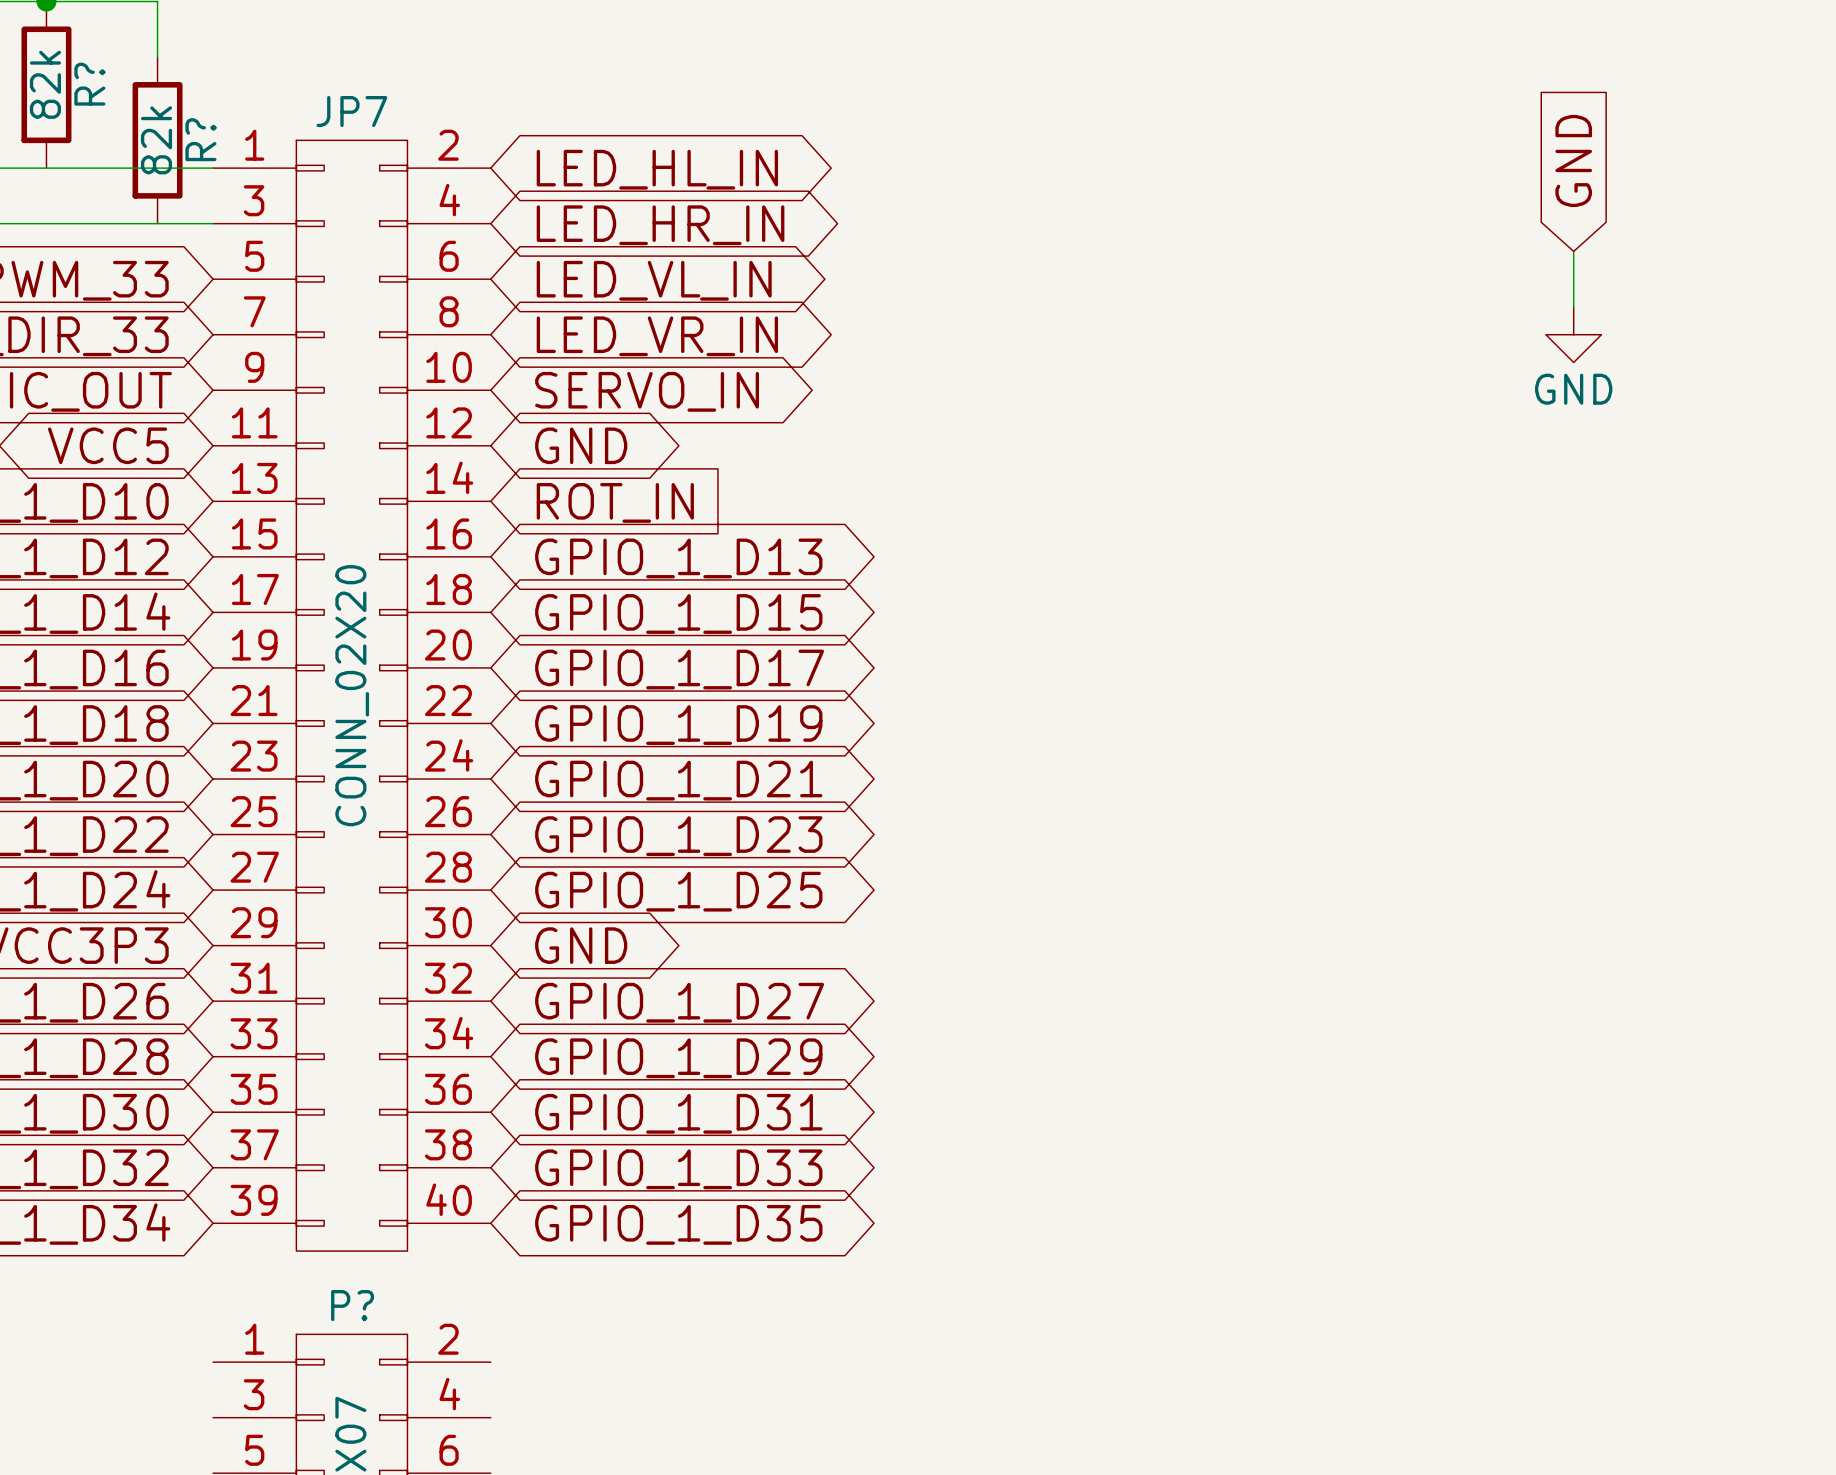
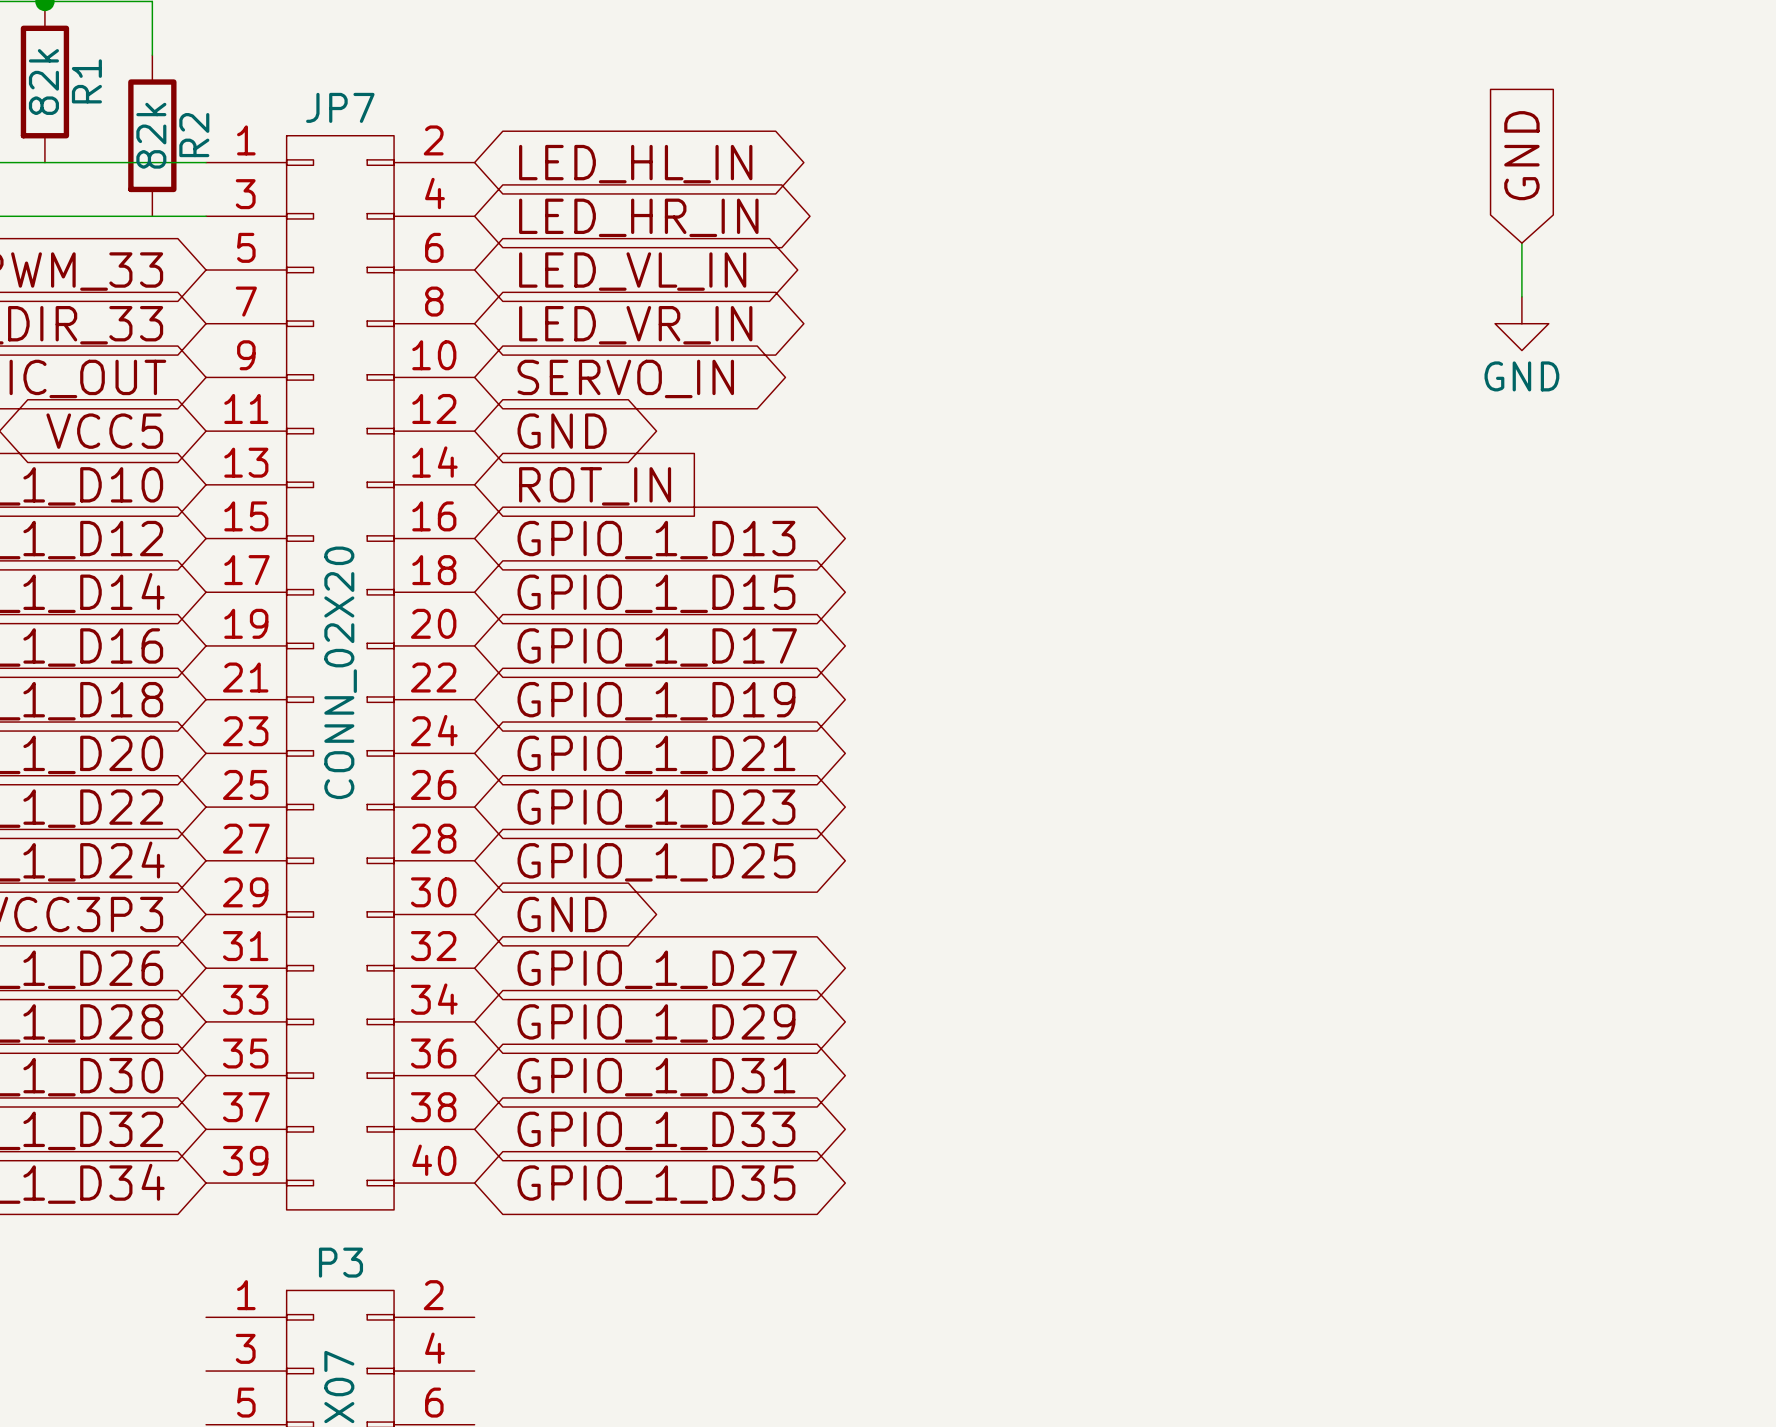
R? name: R? (89, 84) -> R1 (86, 81)
R? name: R? (200, 139) -> R2 (194, 135)
P? name: P? (352, 1305) -> P3 (340, 1262)

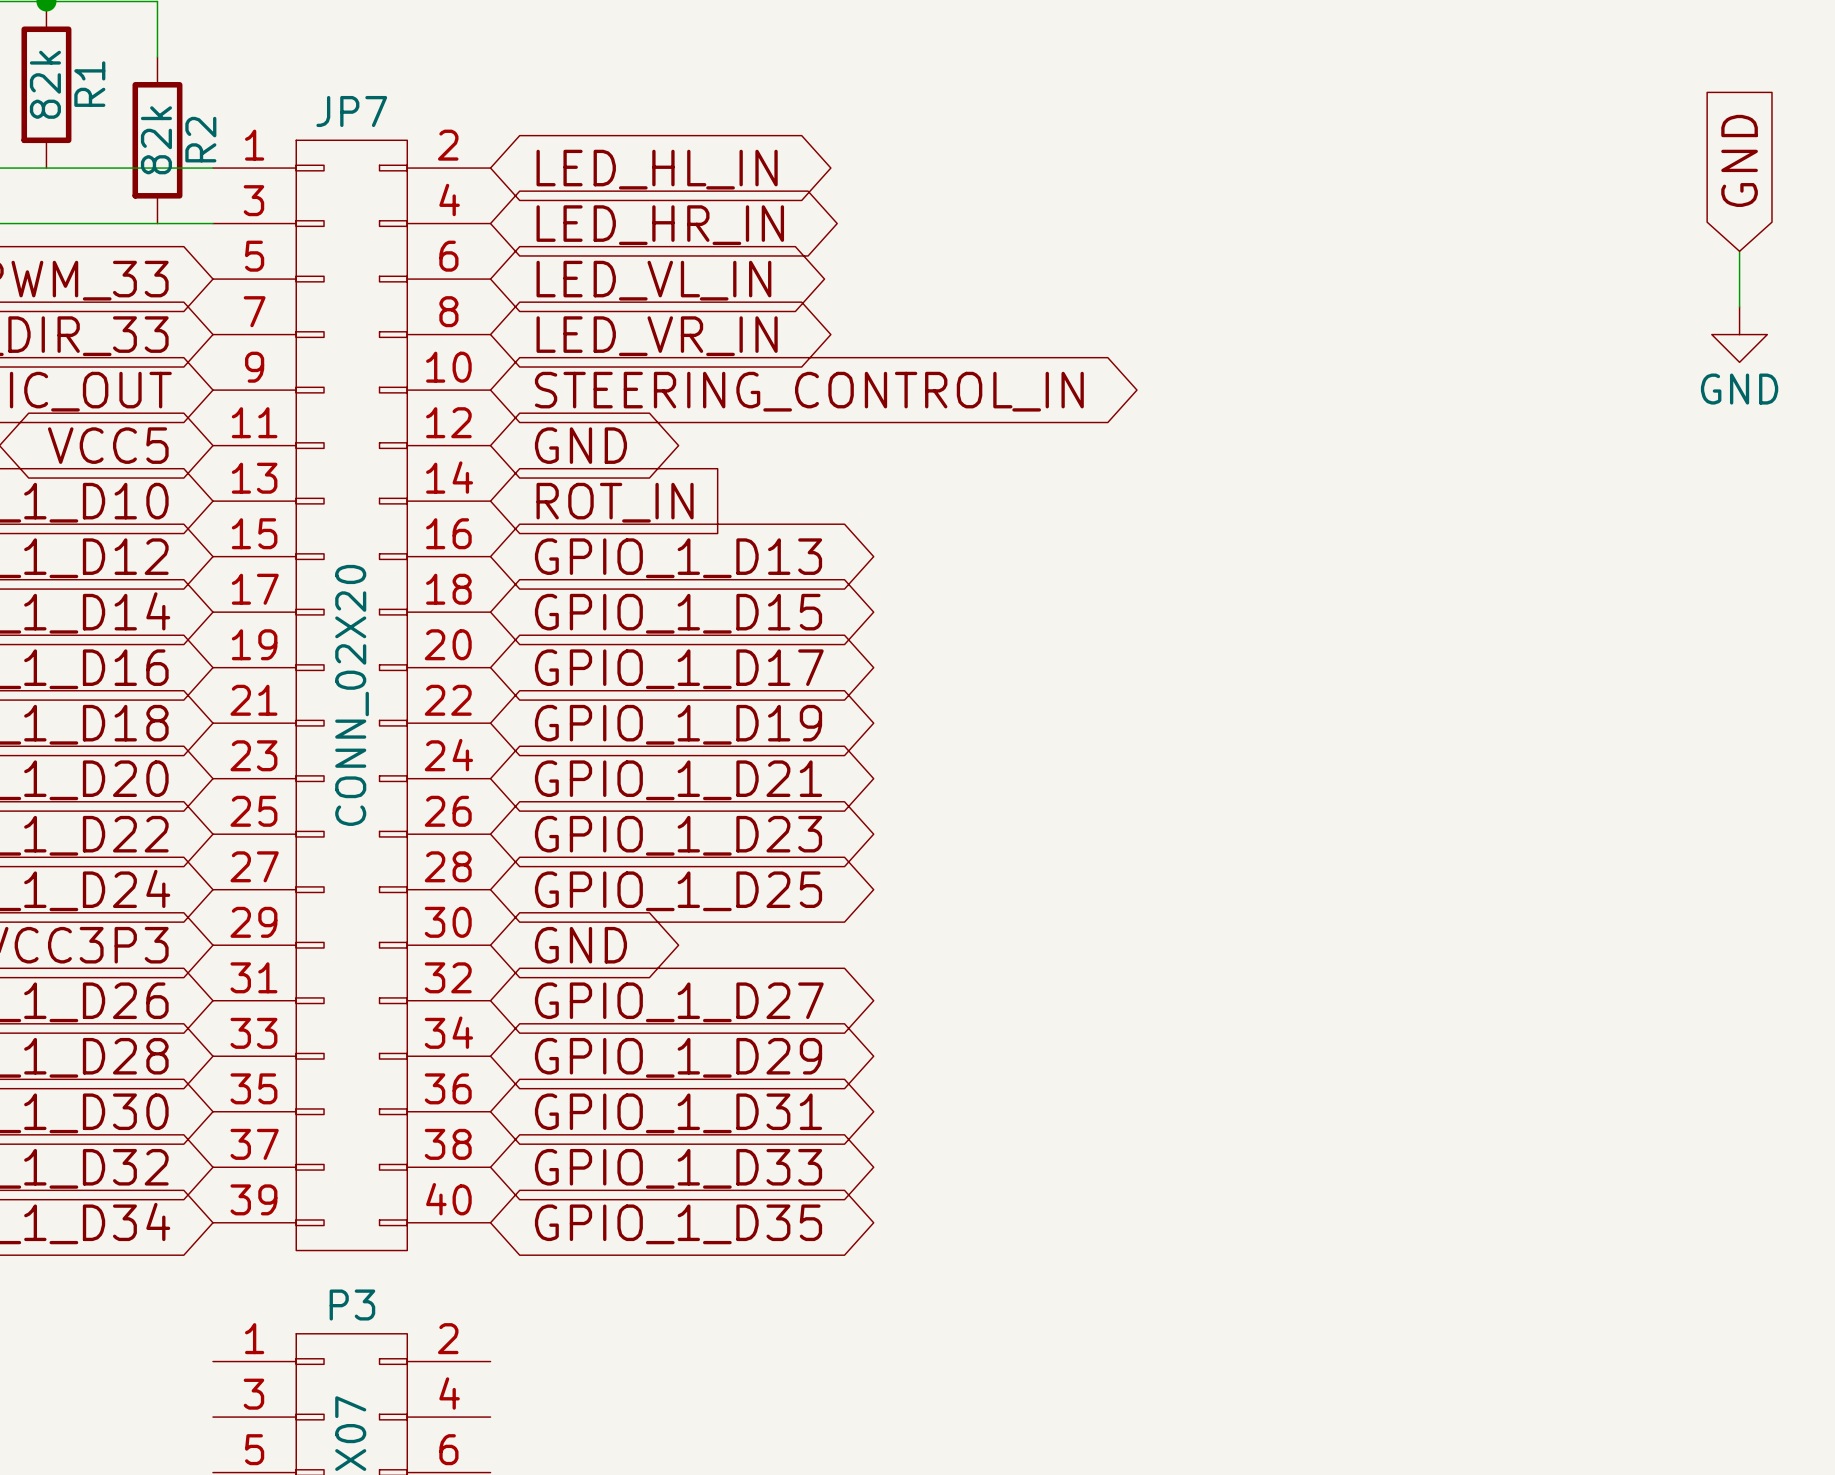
global label position: GND (1521, 155) -> GND (1739, 160)
wire: (1521, 243) (1521, 296) -> (1739, 251) (1739, 306)
power symbol position: GND (1521, 323) -> GND (1739, 334)
global label: SERVO_IN (625, 378) -> STEERING_CONTROL_IN (809, 391)

